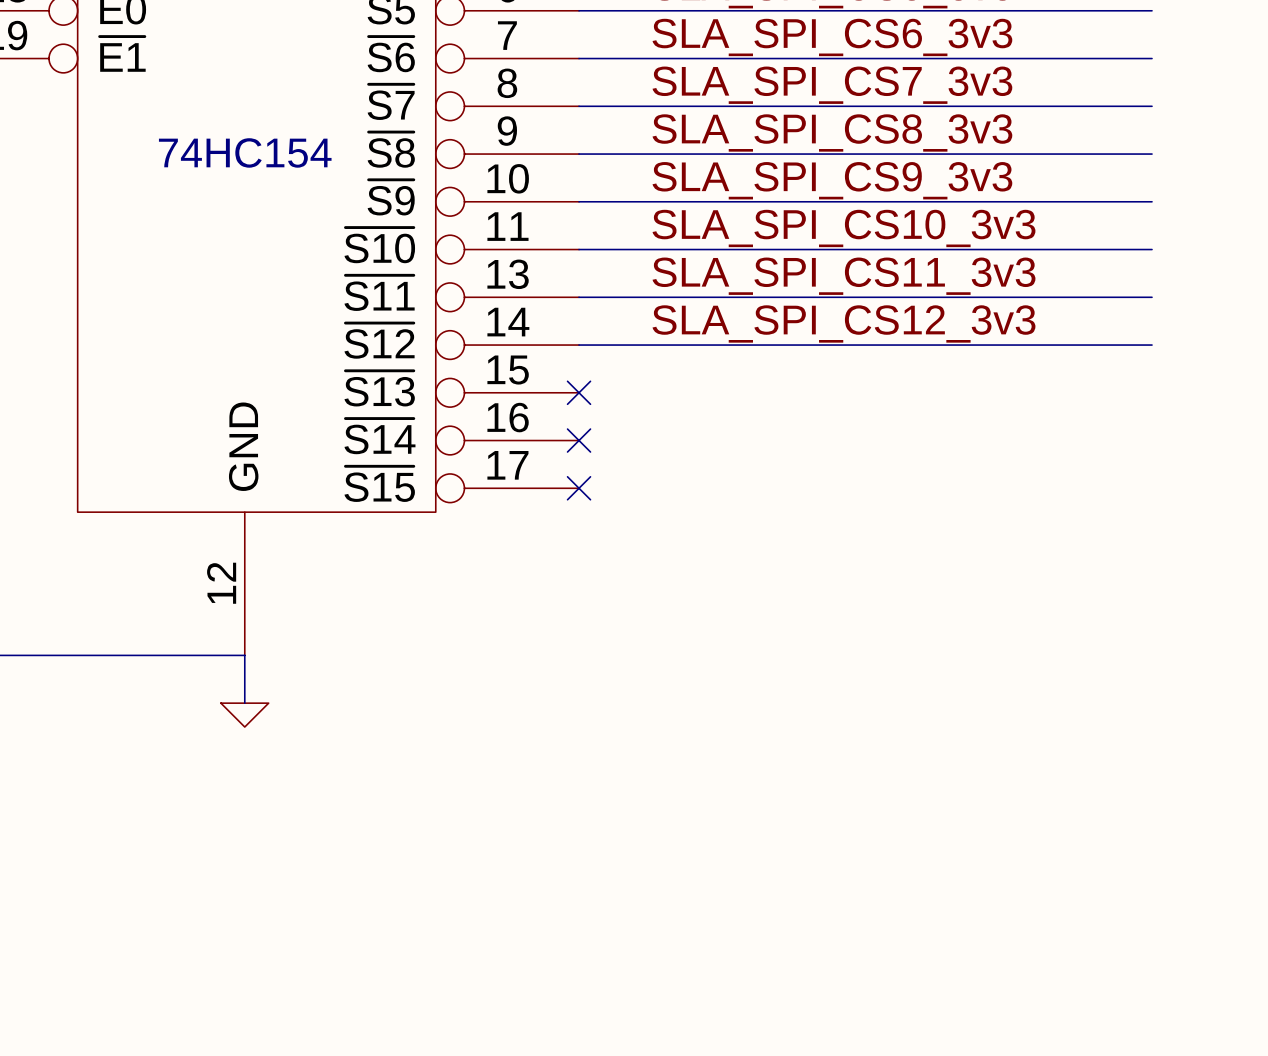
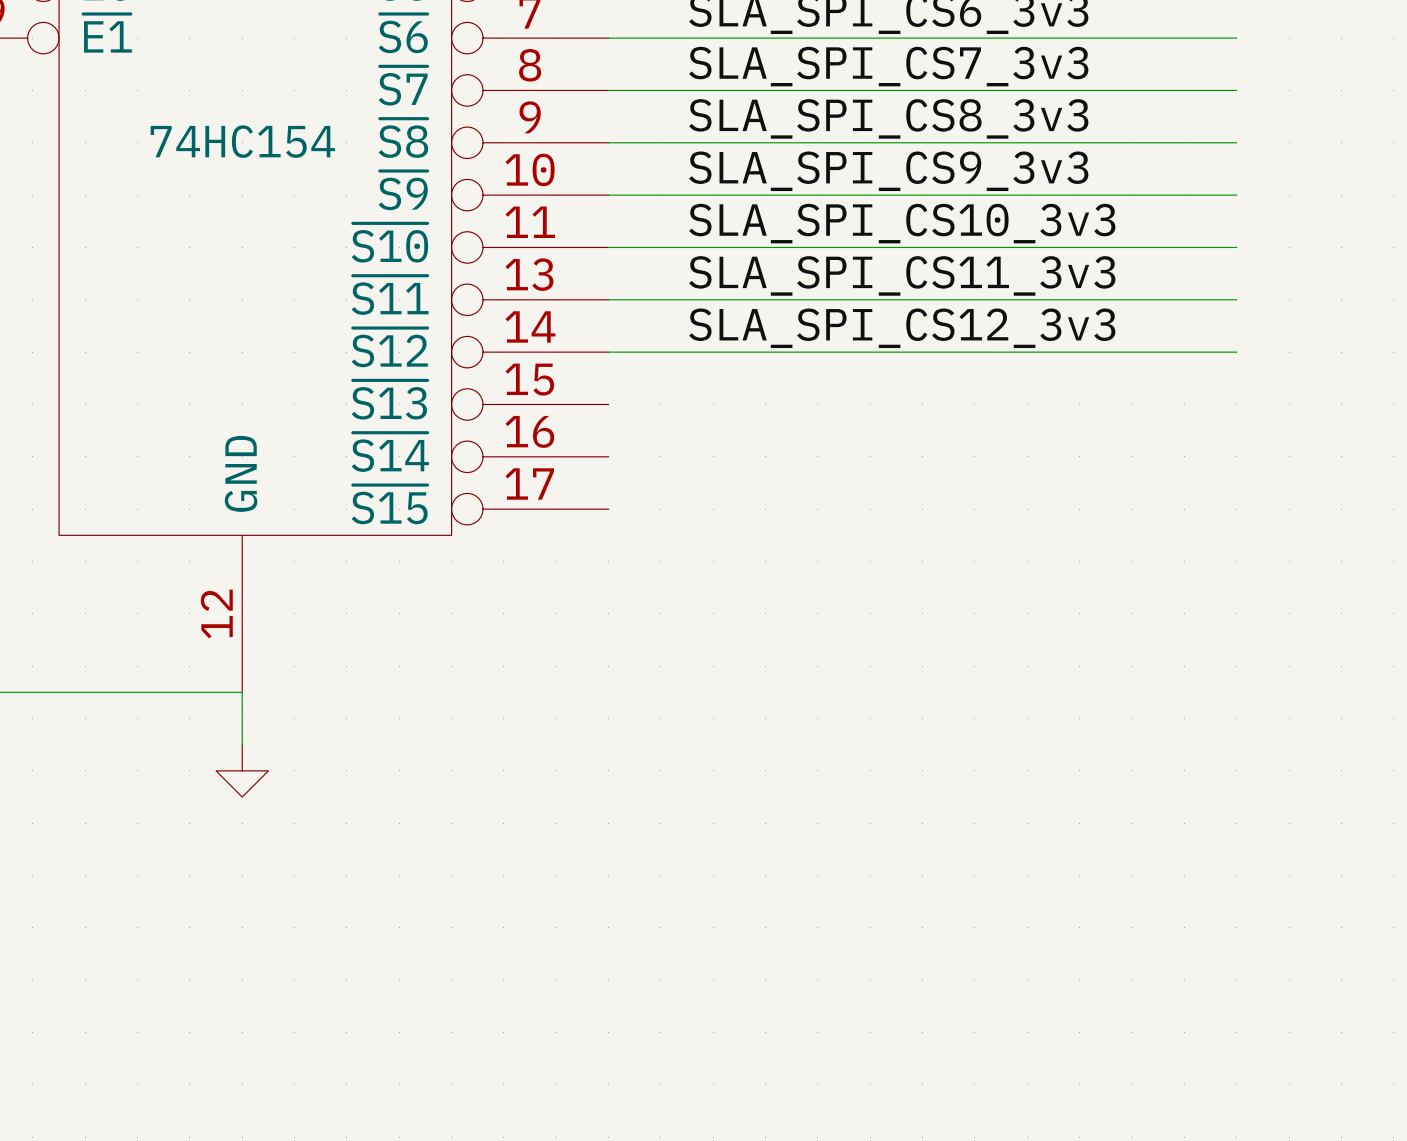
no-connect mark: (579, 392) -> none
no-connect mark: (579, 440) -> none
no-connect mark: (579, 488) -> none
power symbol shape: [220, 703, 269, 728] -> [216, 744, 269, 798]

